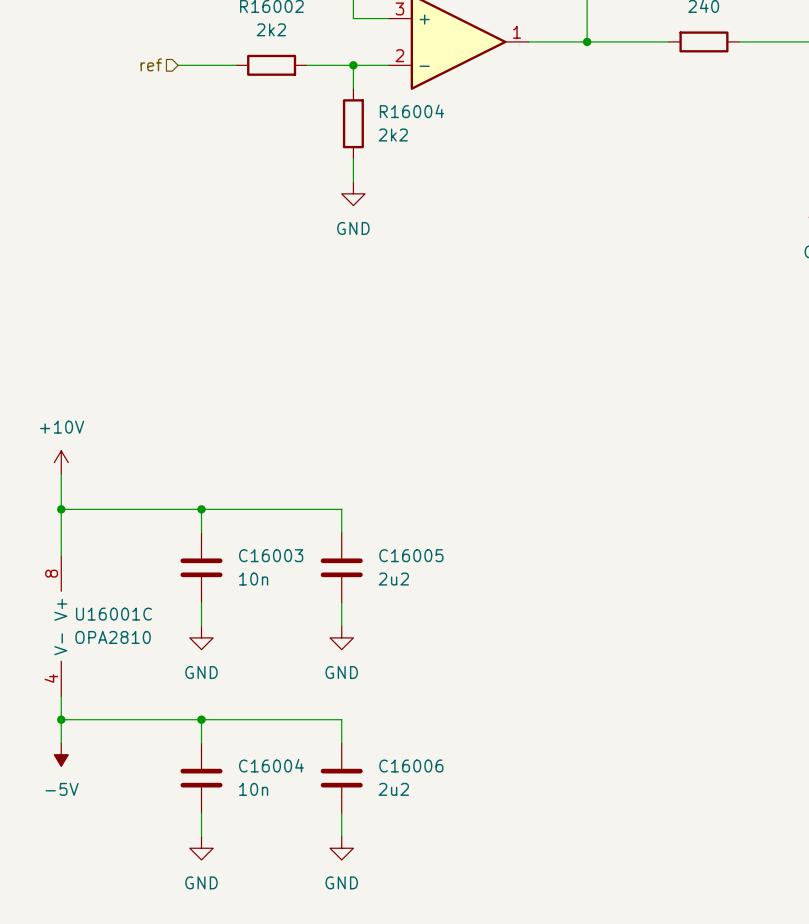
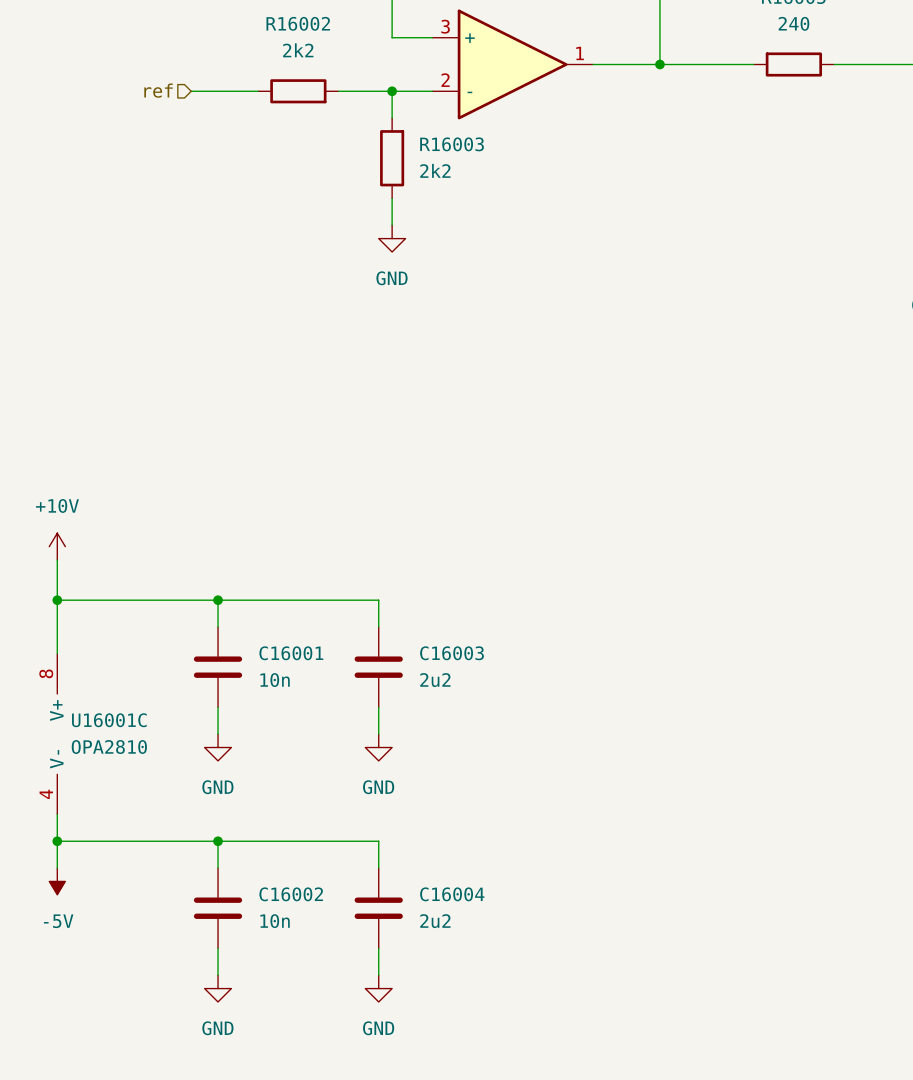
R16004 name: R16004 (411, 111) -> R16003 (452, 144)
C16003 name: C16003 (271, 555) -> C16001 (291, 653)
C16005 name: C16005 (411, 555) -> C16003 (452, 653)
C16004 name: C16004 (271, 765) -> C16002 (291, 894)
C16006 name: C16006 (411, 766) -> C16004 (452, 894)

